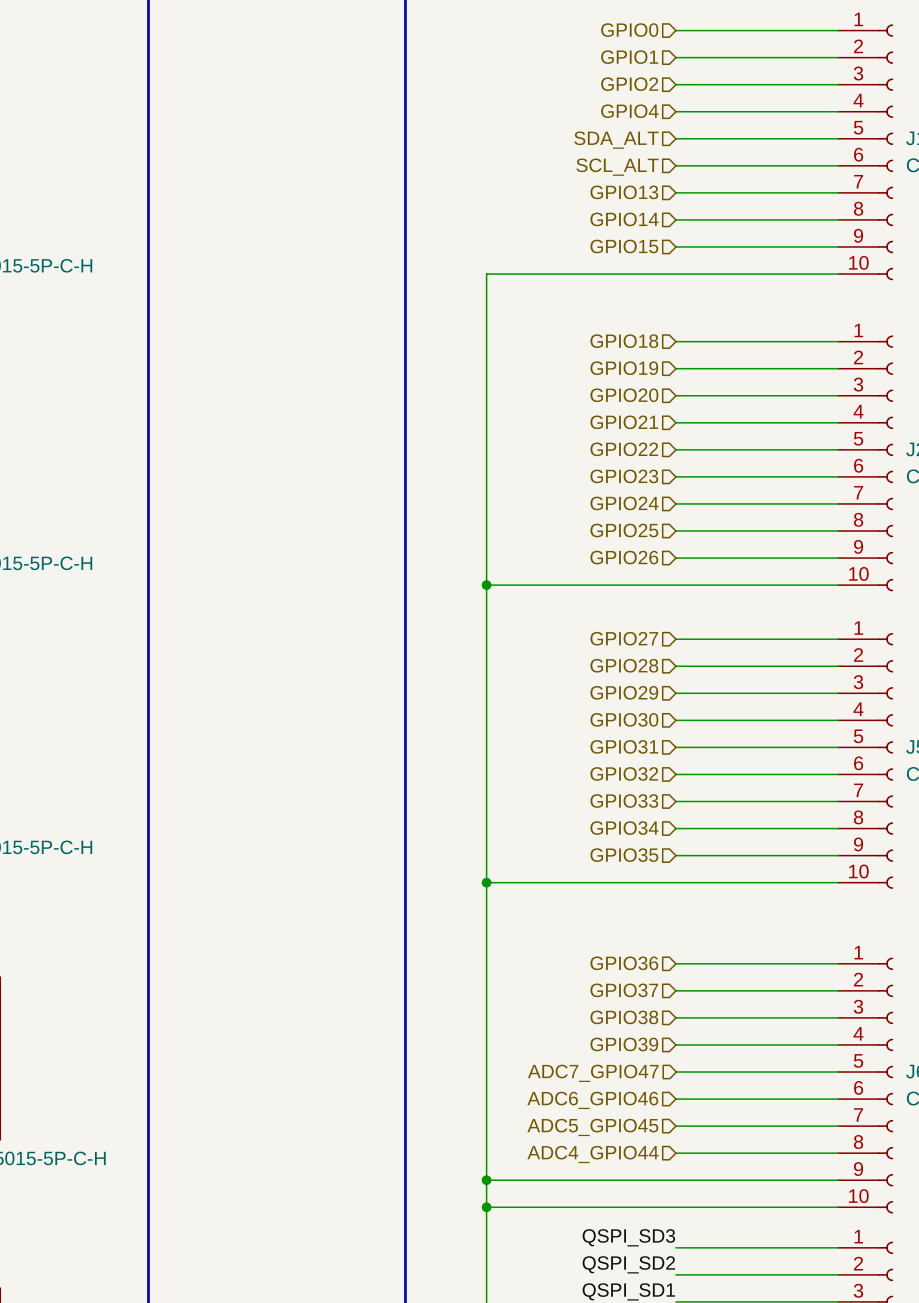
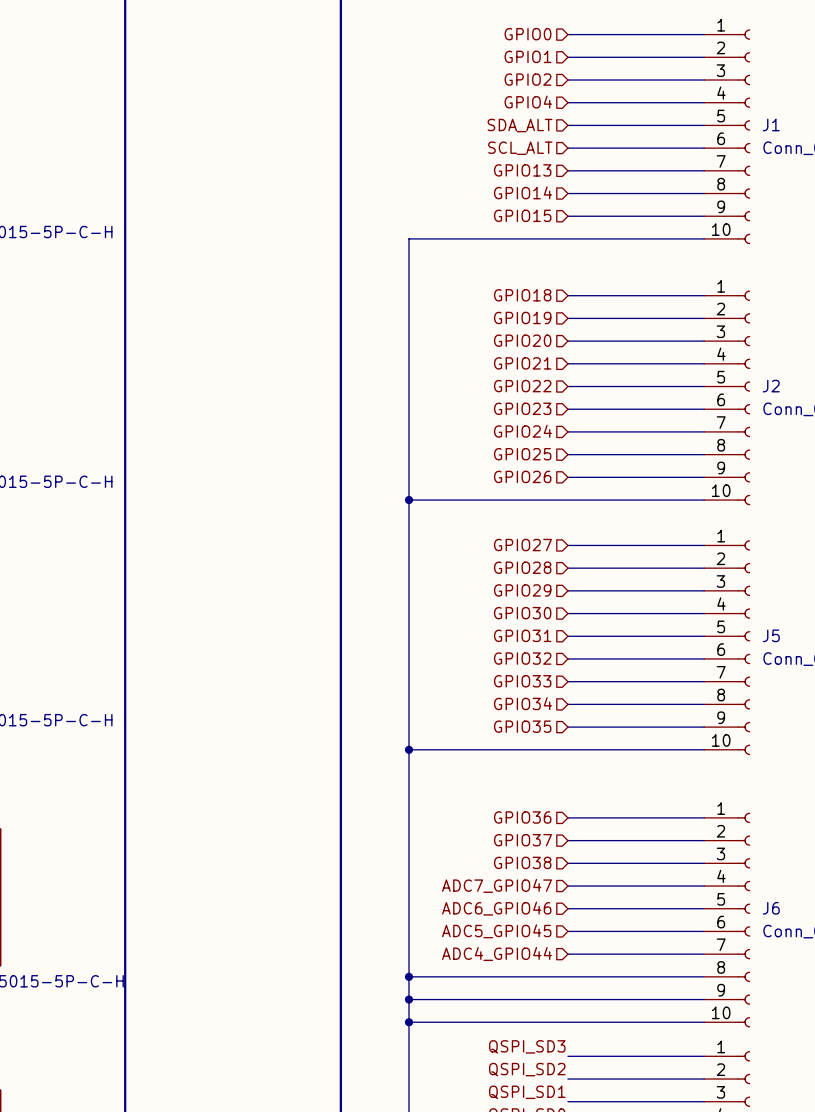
hierarchical label: GPIO39 (624, 1044) -> ADC7_GPIO47 (496, 885)
hierarchical label: ADC7_GPIO47 (593, 1073) -> ADC6_GPIO46 (496, 908)
hierarchical label: ADC6_GPIO46 (592, 1100) -> ADC5_GPIO45 (496, 931)
hierarchical label: ADC5_GPIO45 (592, 1127) -> ADC4_GPIO44 (496, 953)
wire: none -> (409, 976) (567, 976)
junction: none -> (409, 976)
hierarchical label: ADC4_GPIO44 (592, 1154) -> none

